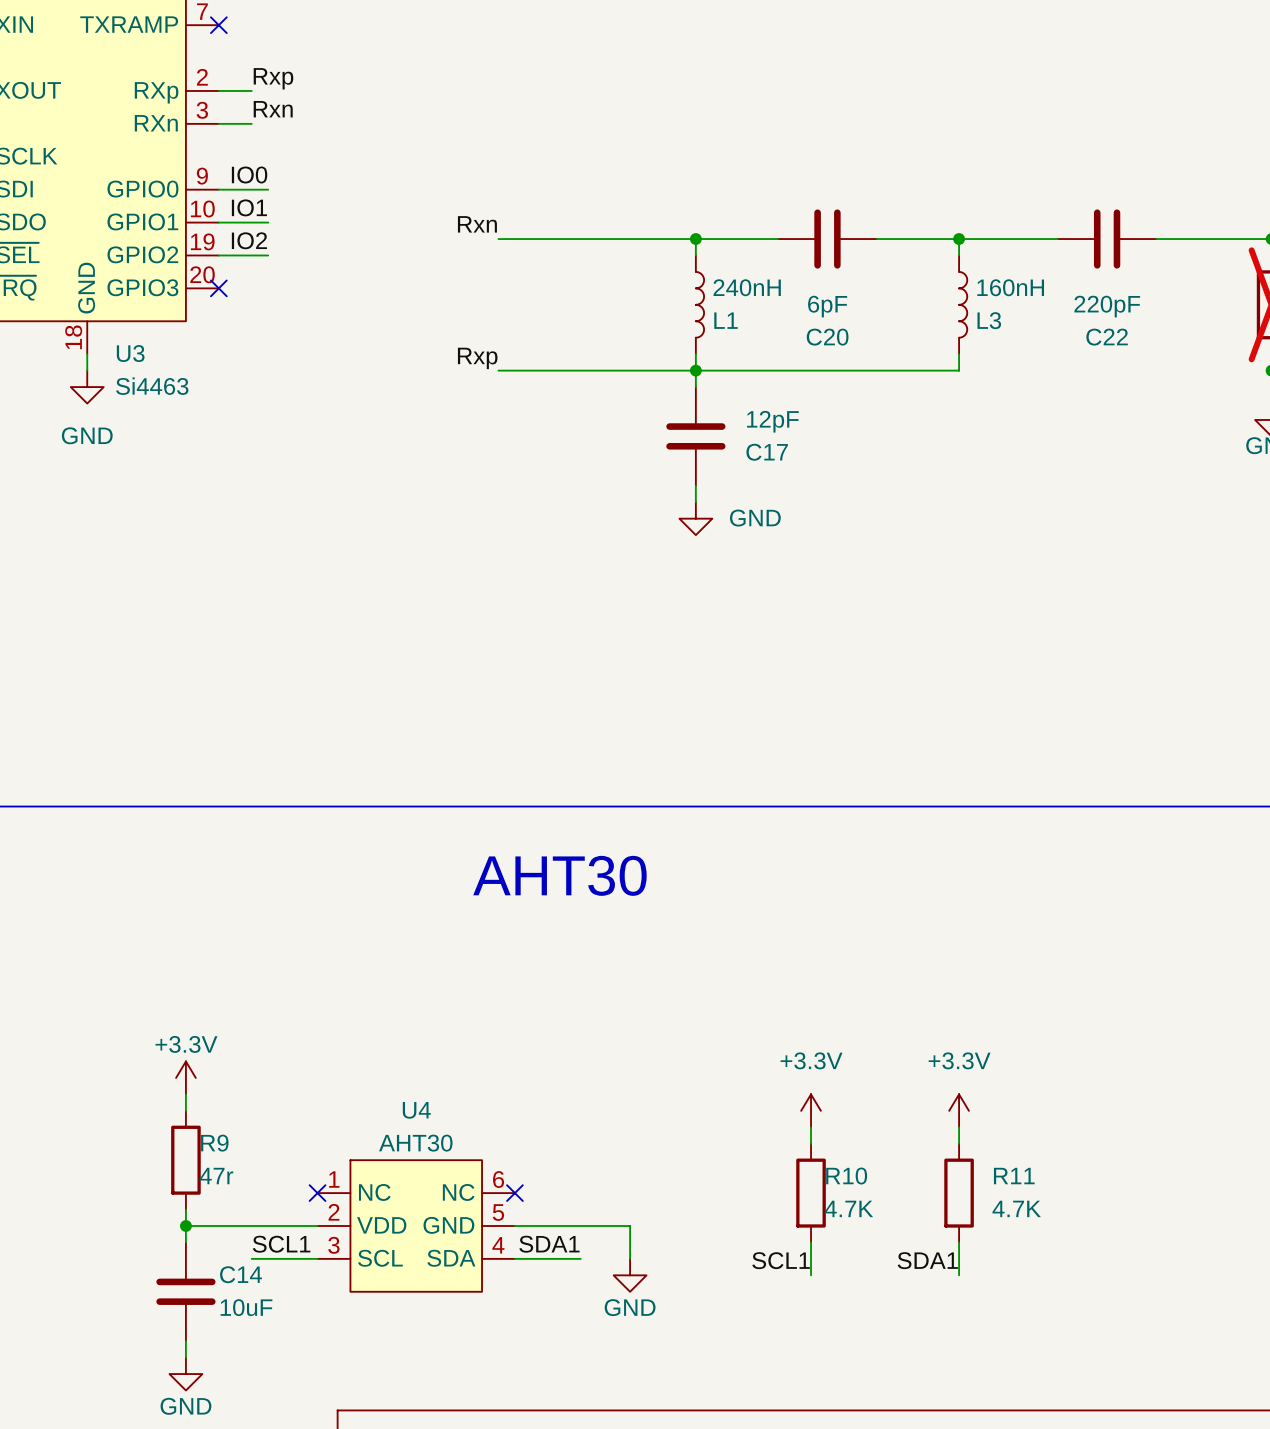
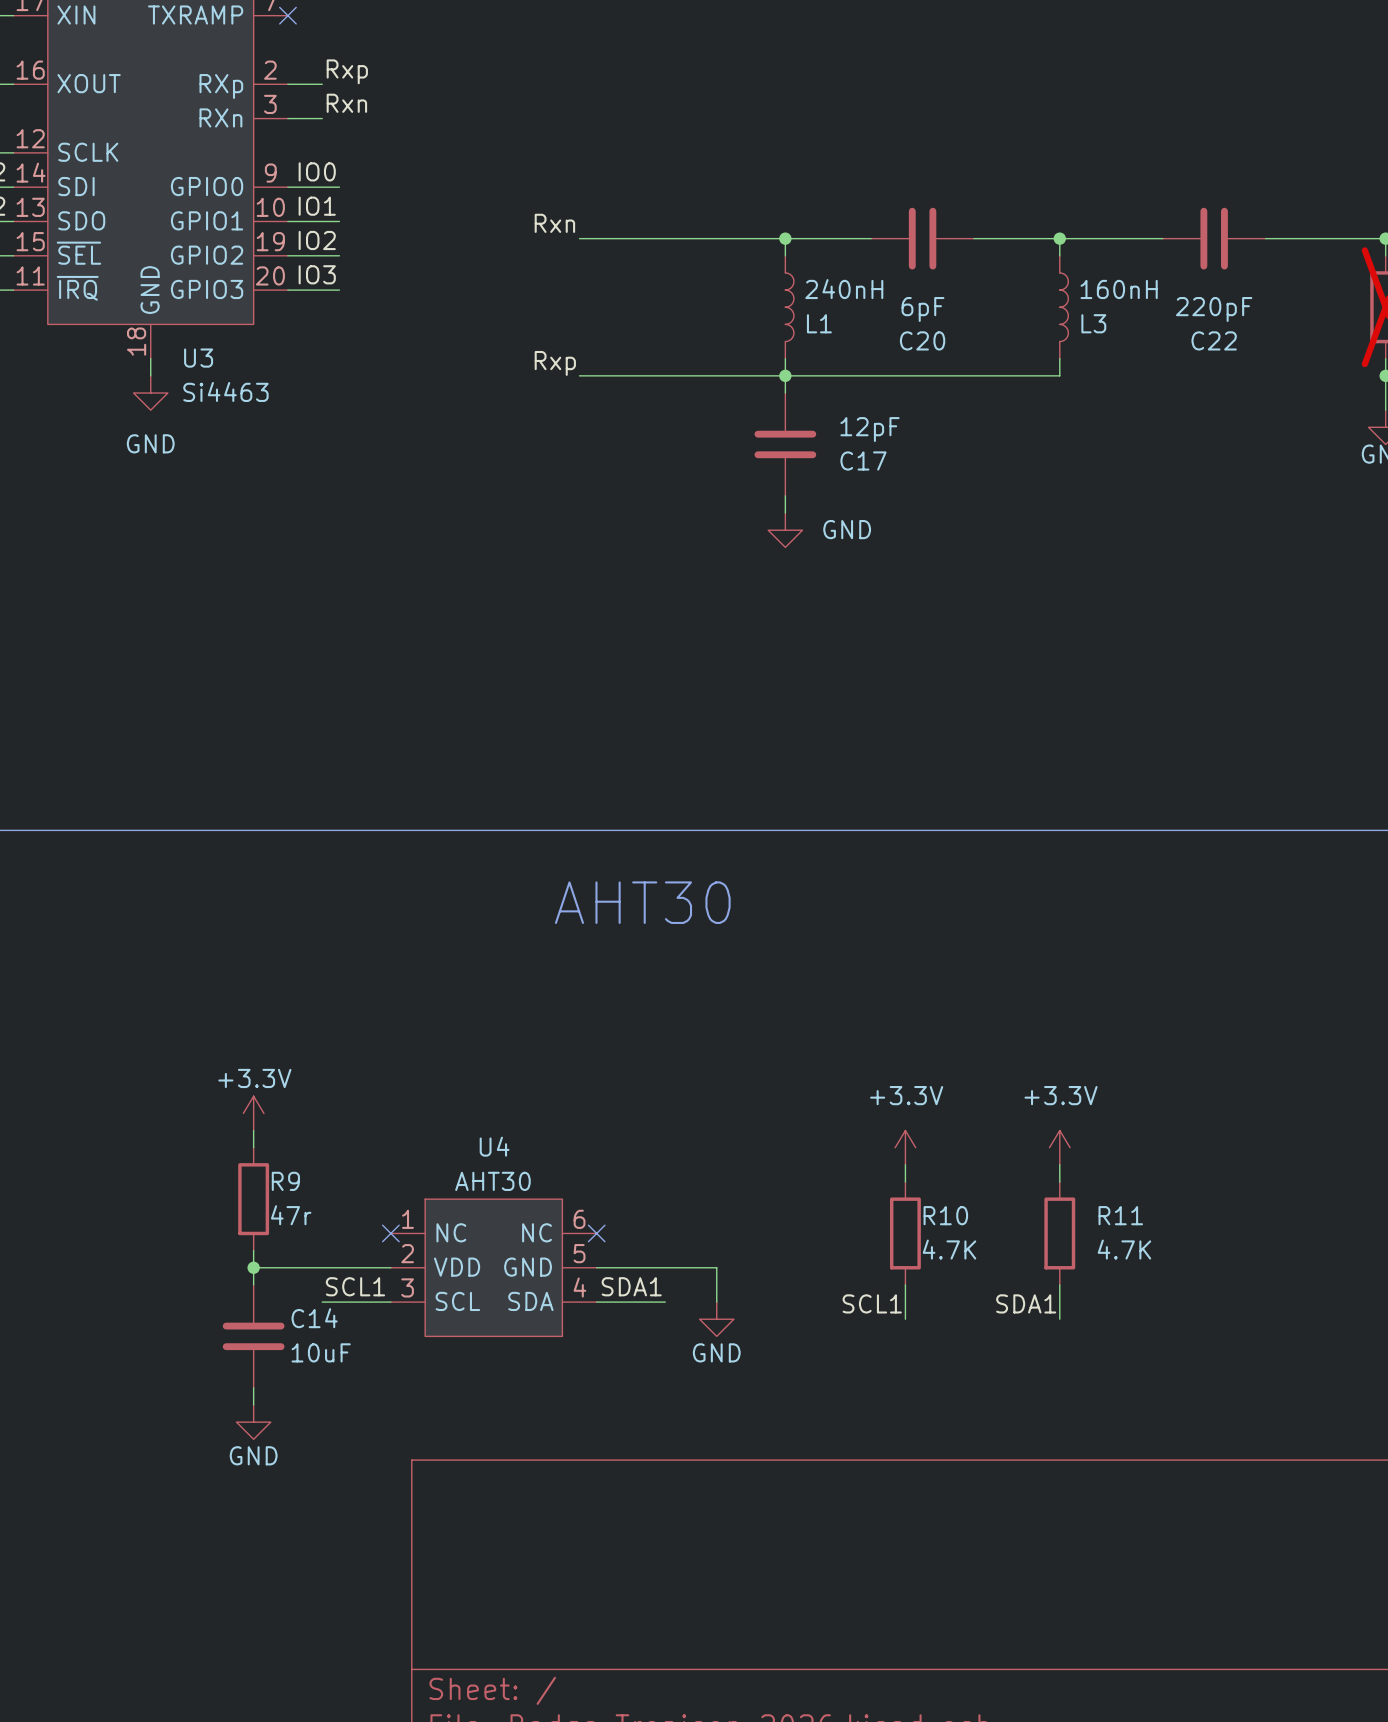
label: none -> IO3 (317, 274)
wire: none -> (287, 290) (339, 290)
no-connect mark: (218, 288) -> none

